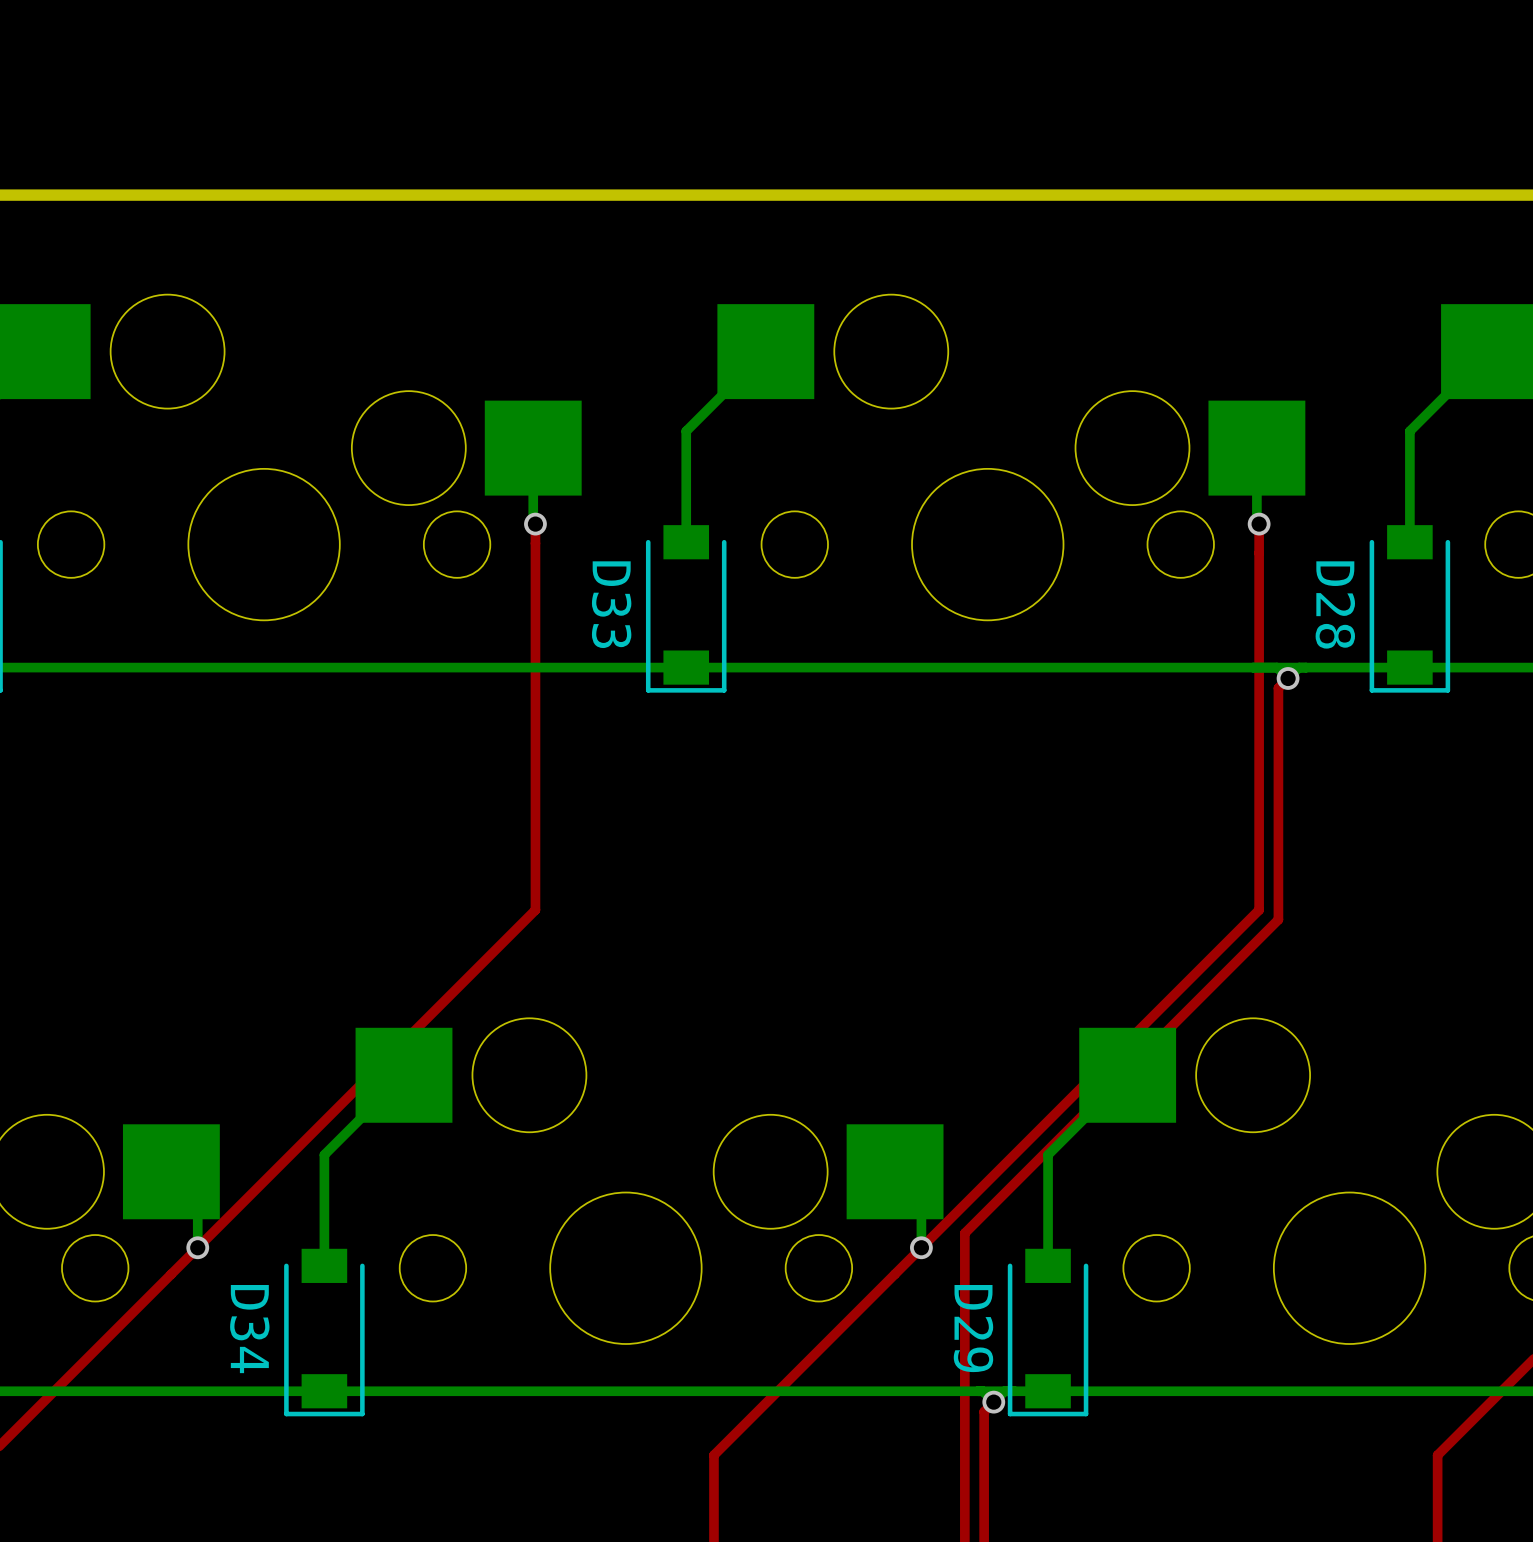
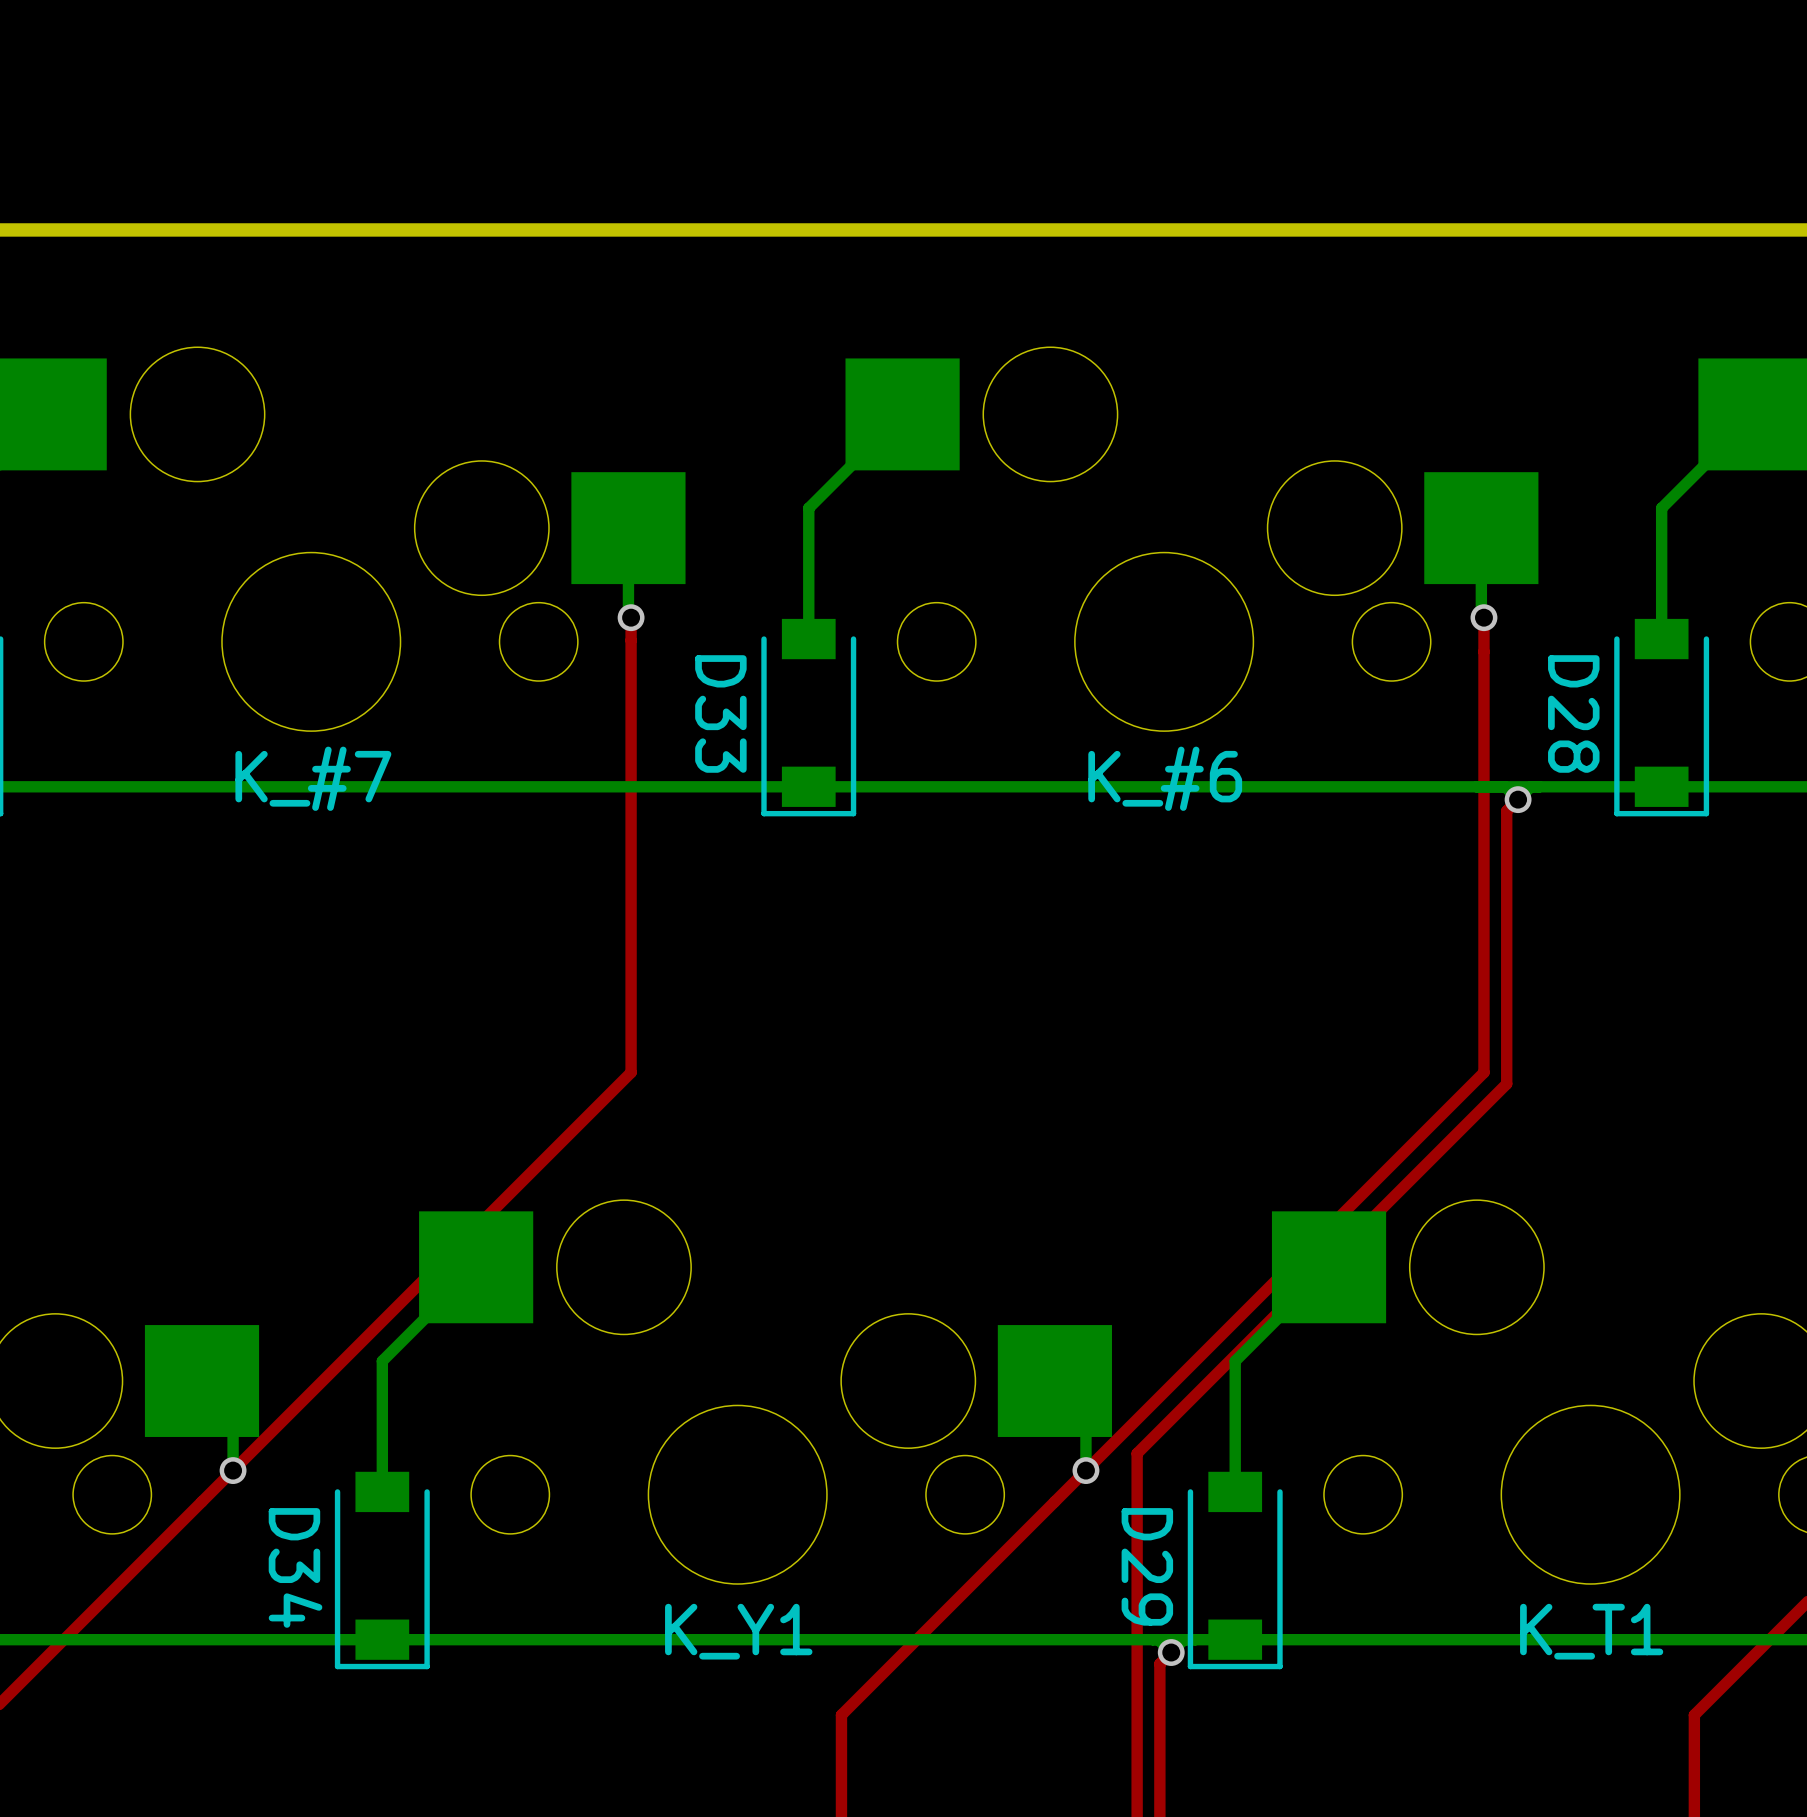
K_#6 name: none -> K_#6 (1165, 778)
K_#7 name: none -> K_#7 (313, 778)
K_Y1 name: none -> K_Y1 (738, 1631)
K_T1 name: none -> K_T1 (1591, 1631)

